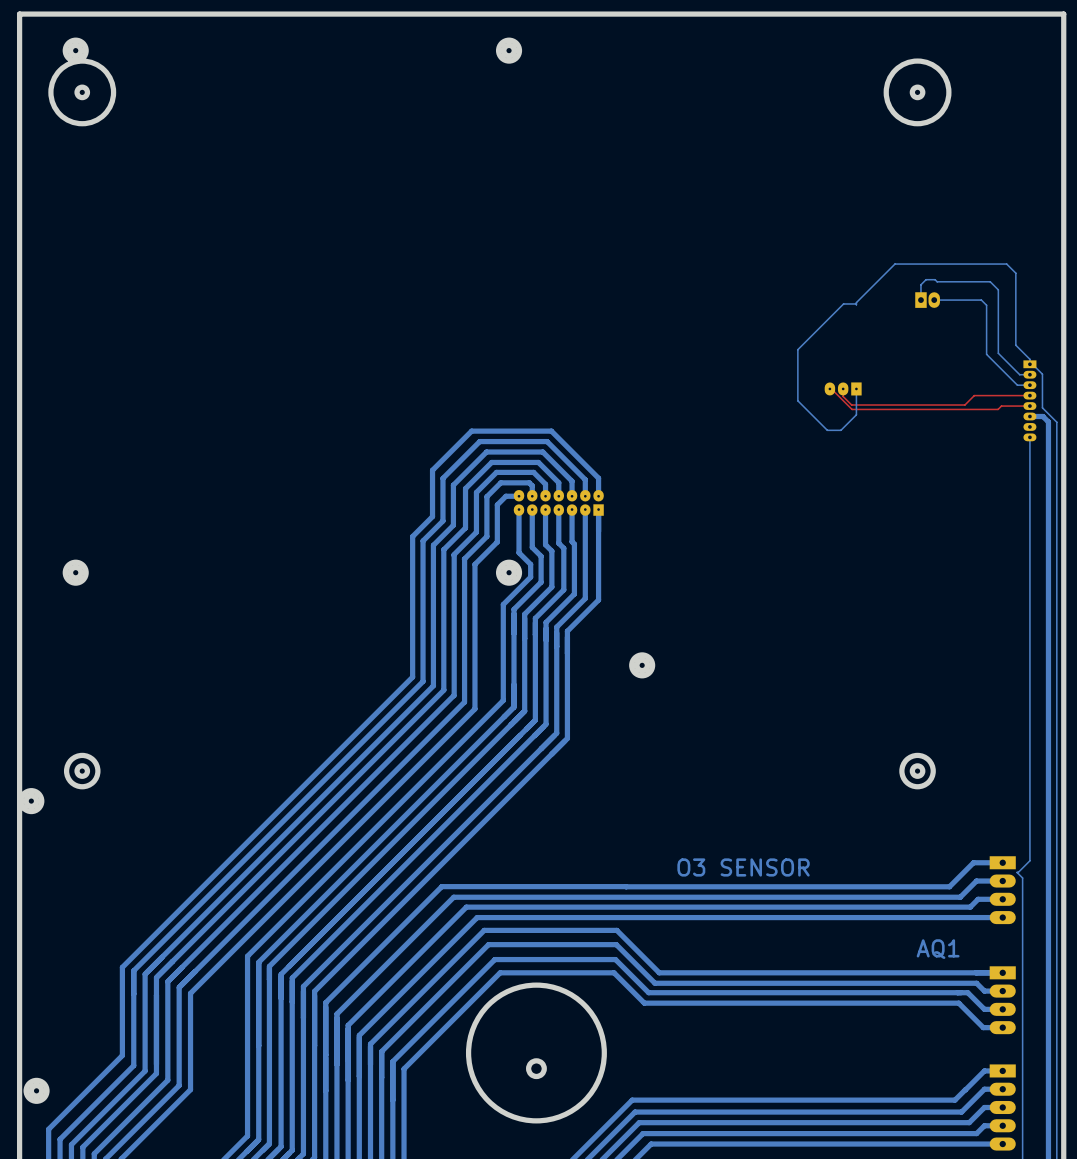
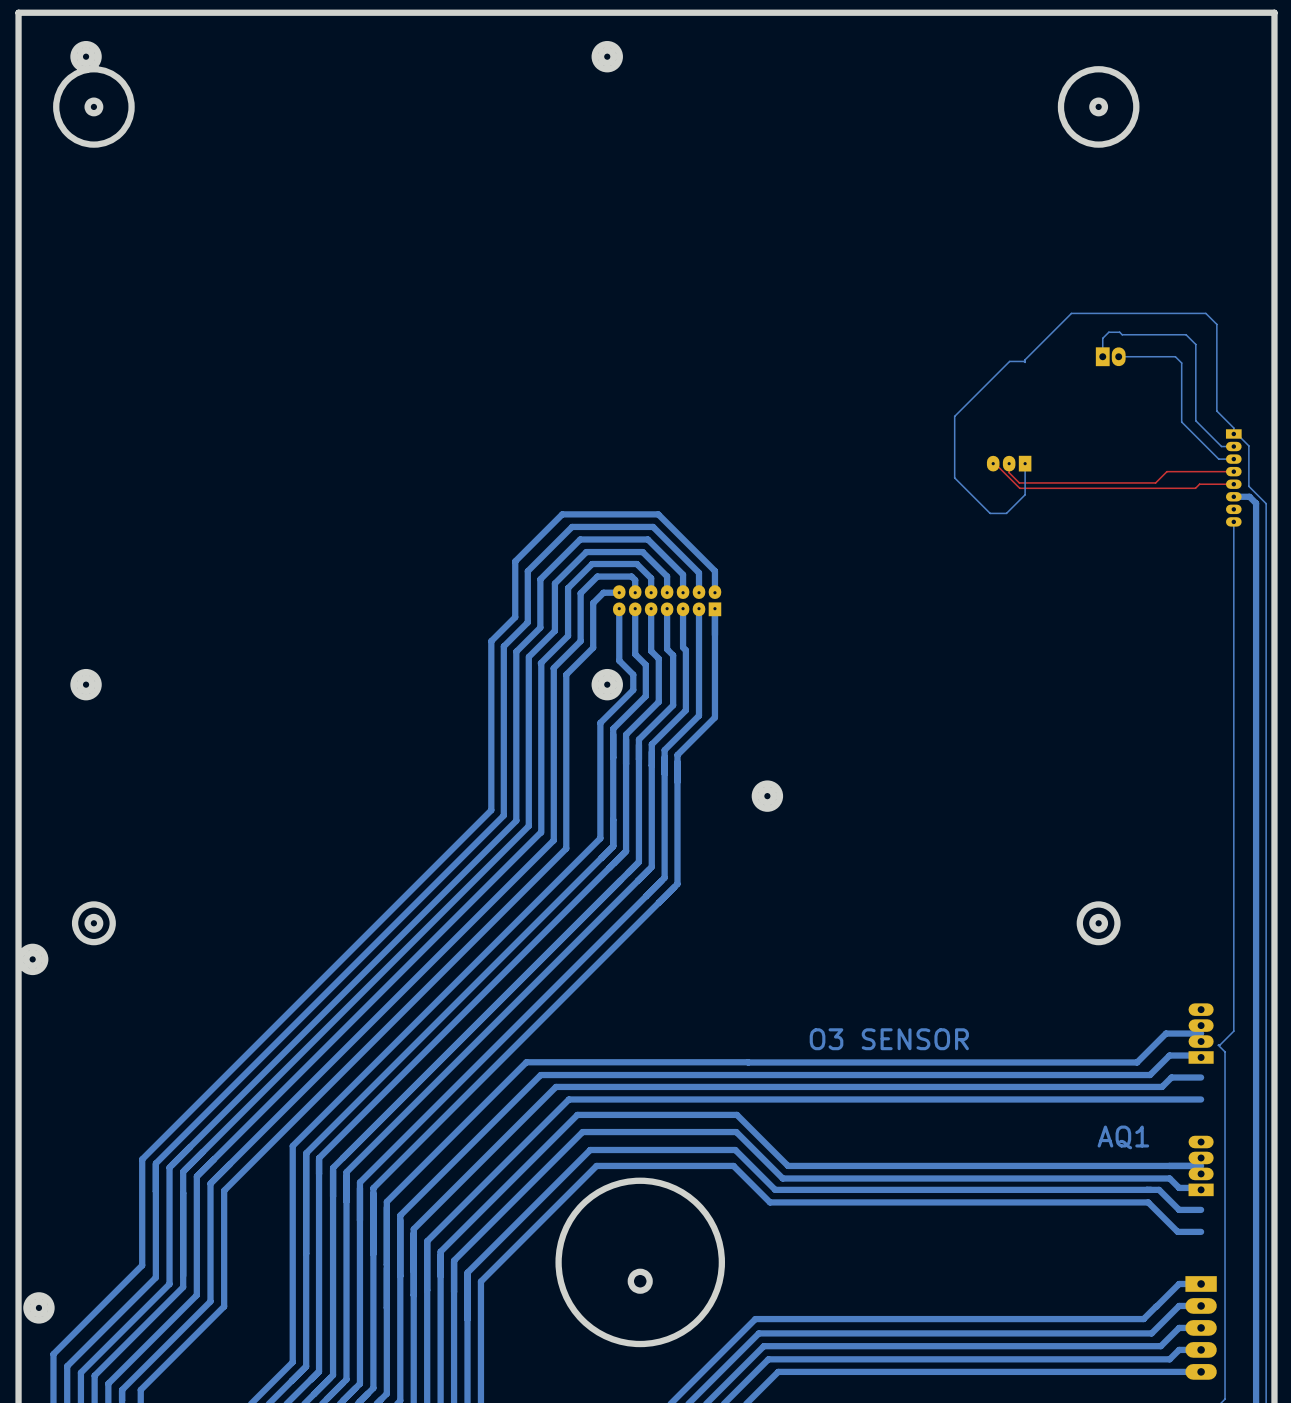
part: none -> (1201, 1033)
part: (1002, 890) -> none
part: none -> (1201, 1165)
part: (1002, 1000) -> none

